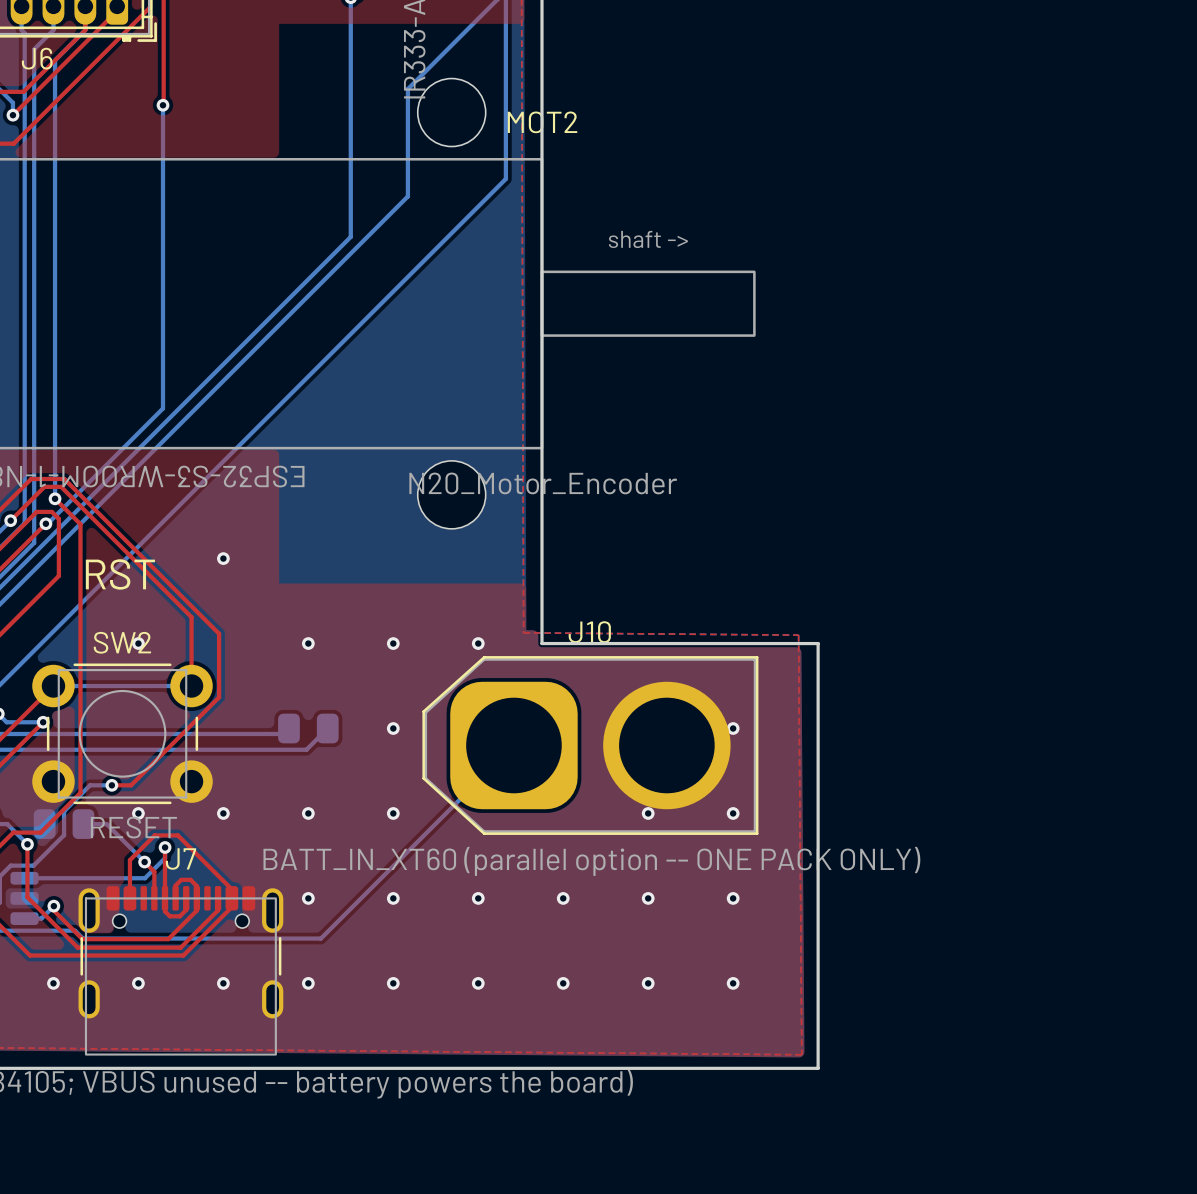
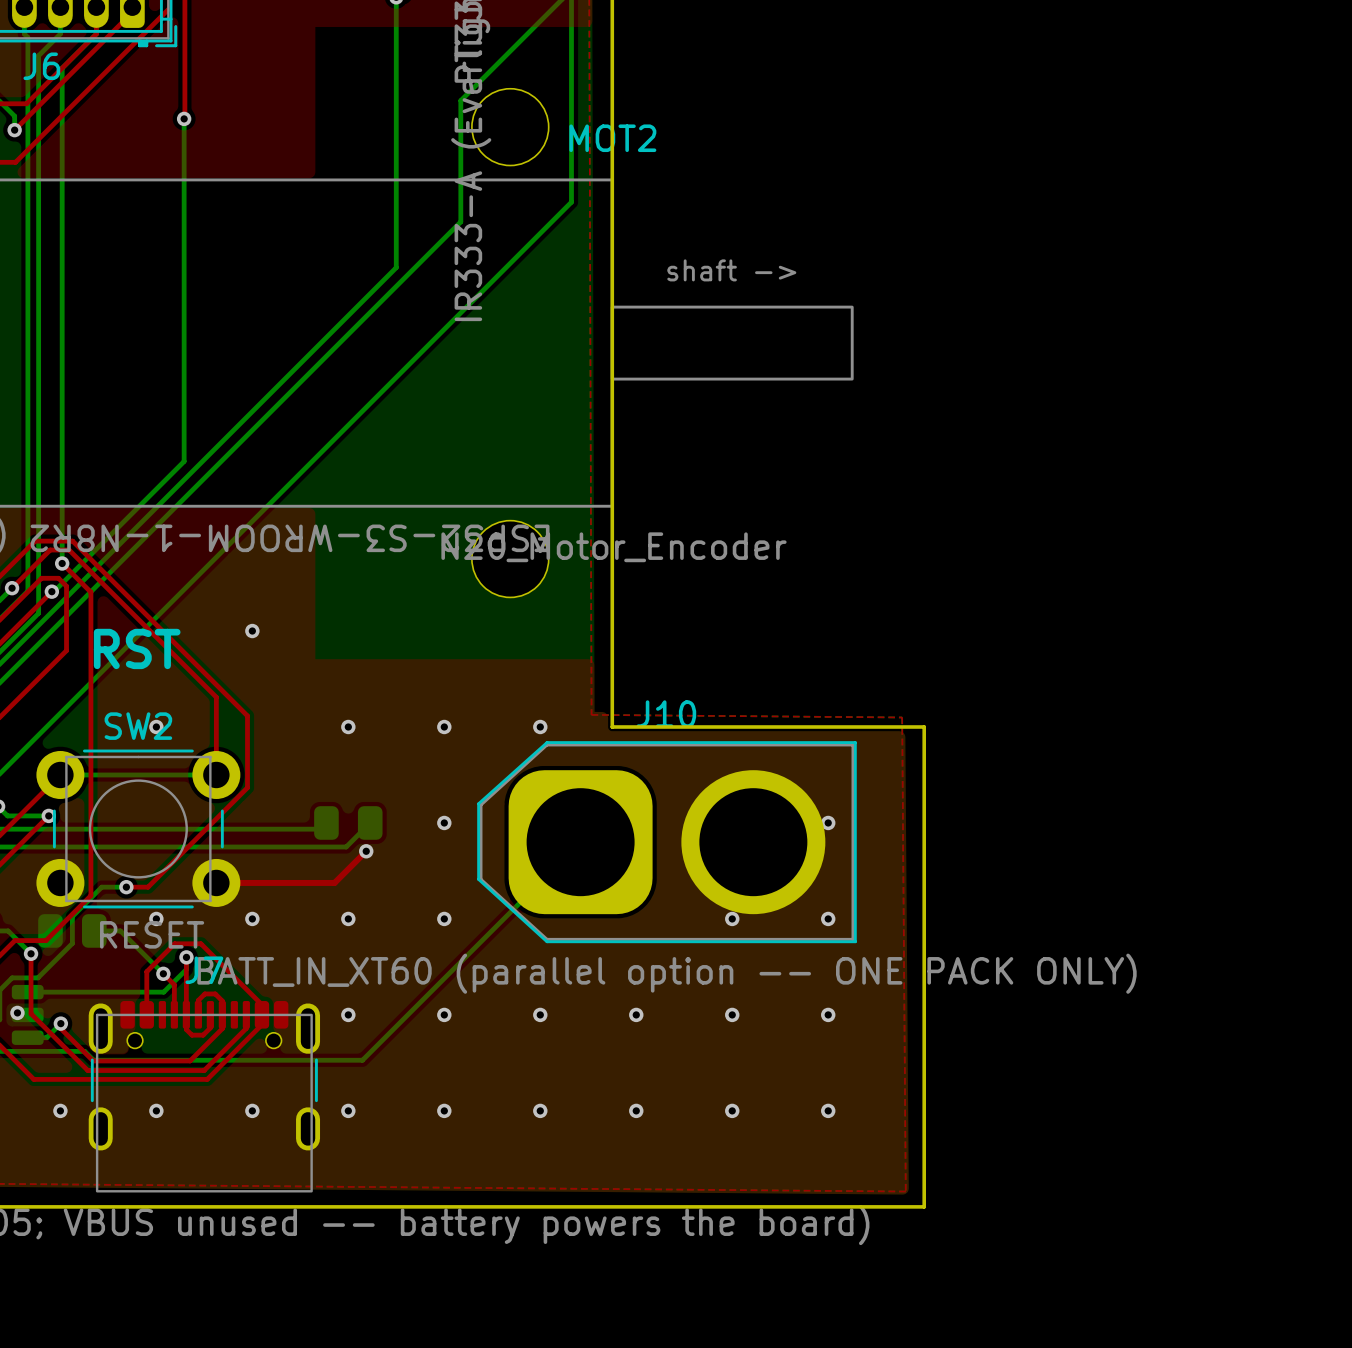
top track: none -> (366, 851) (334, 882) (216, 882)
via: none -> (366, 851)
via: none -> (17, 1012)

